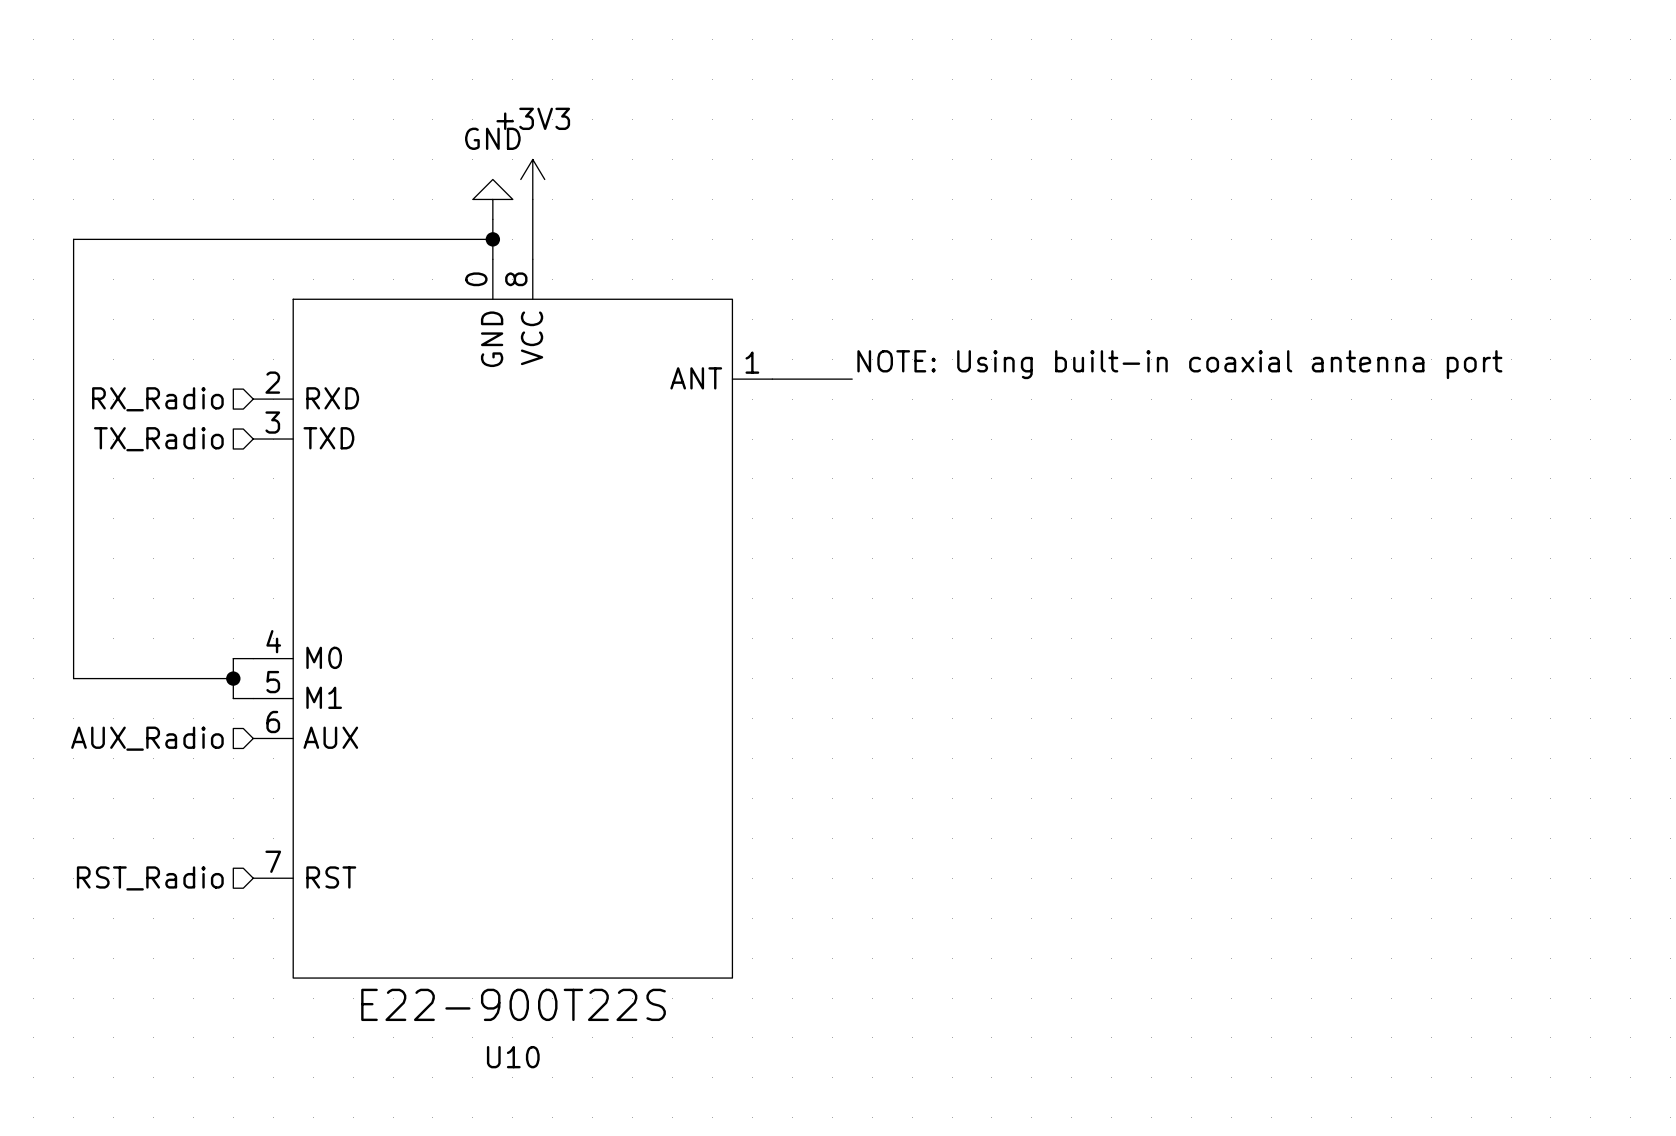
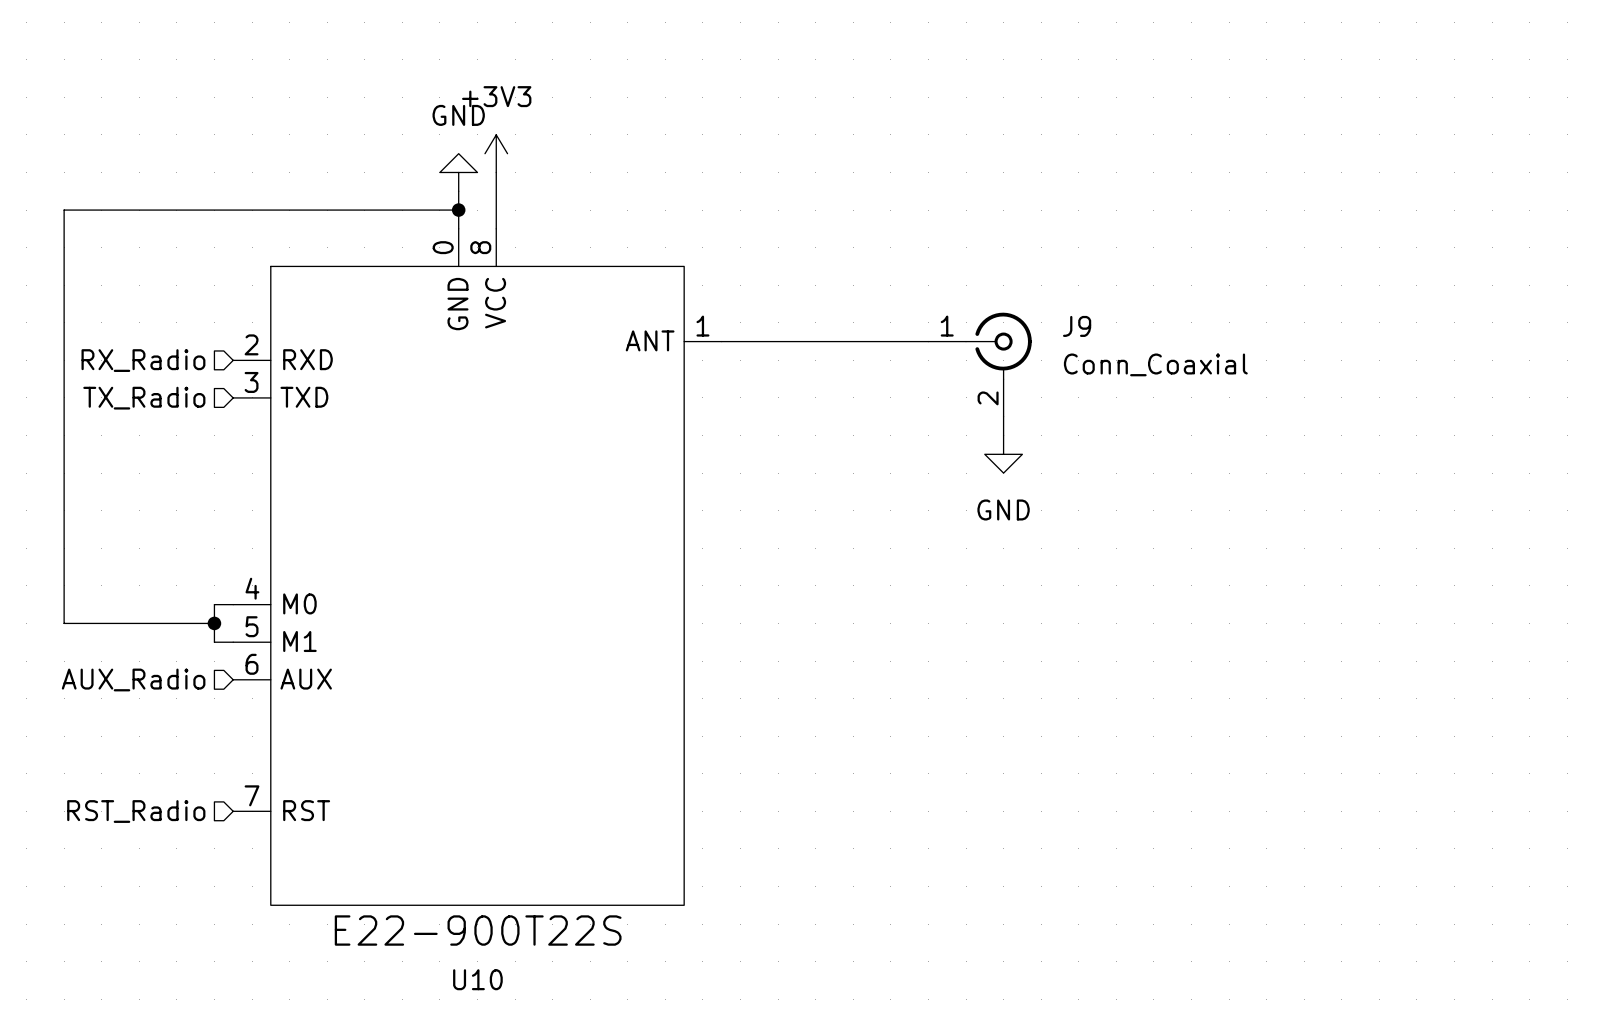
label: NOTE: Using built-in coaxial antenna port (1179, 364) -> none
wire: none -> (796, 341) (928, 341)
J9: none -> Conn_Coaxial (980, 364)
wire: none -> (1003, 416) (1003, 435)
power symbol: none -> GND (1003, 454)

